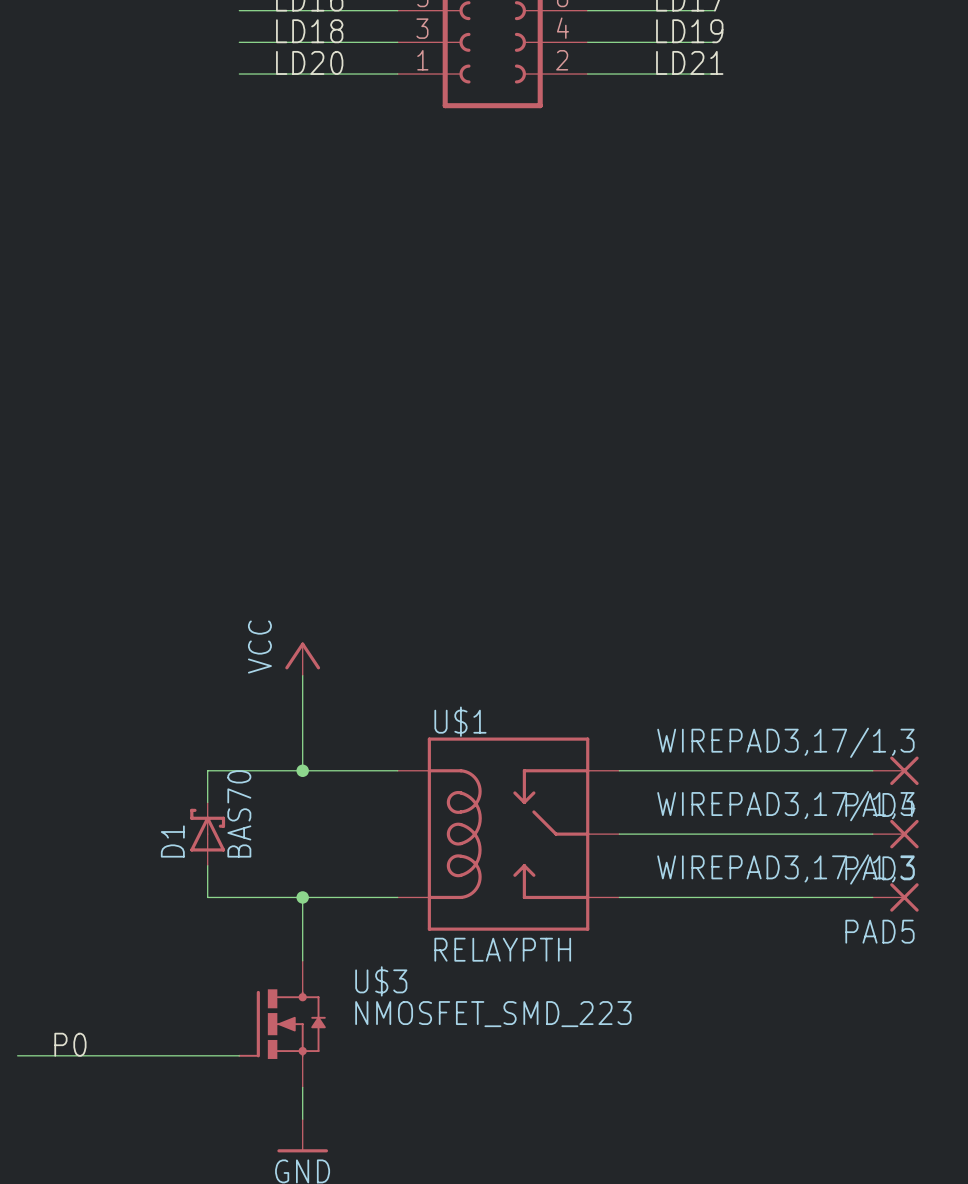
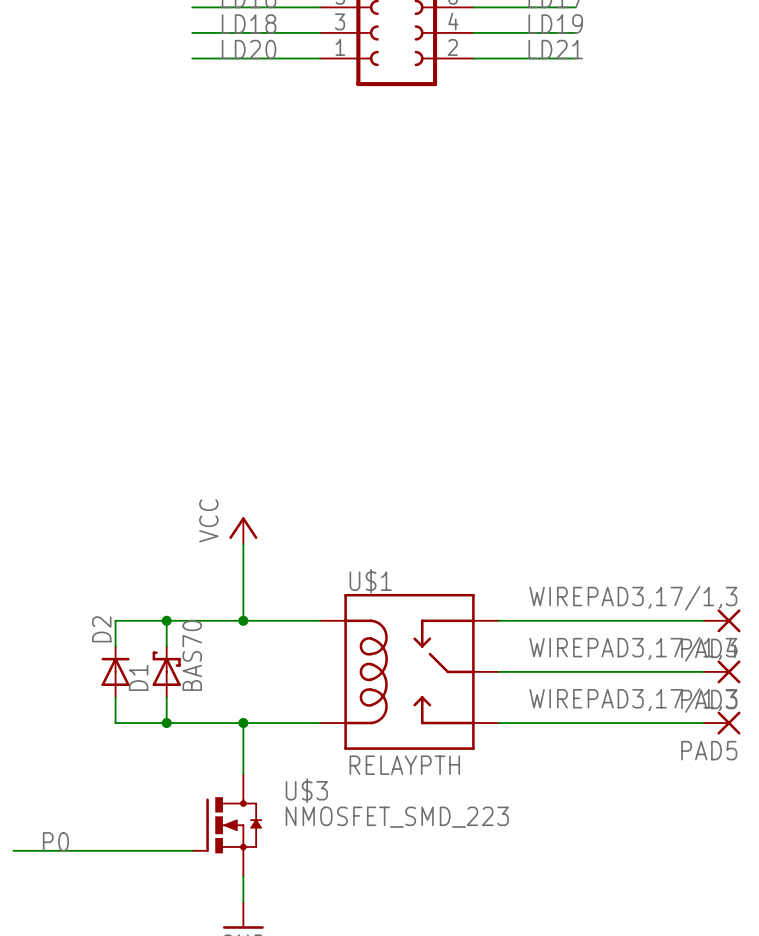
wire: none -> (166, 620) (115, 620) (115, 646)
junction: none -> (166, 620)
D2: none -> (115, 671)
wire: none -> (115, 697) (115, 723) (166, 723)
junction: none -> (166, 723)

